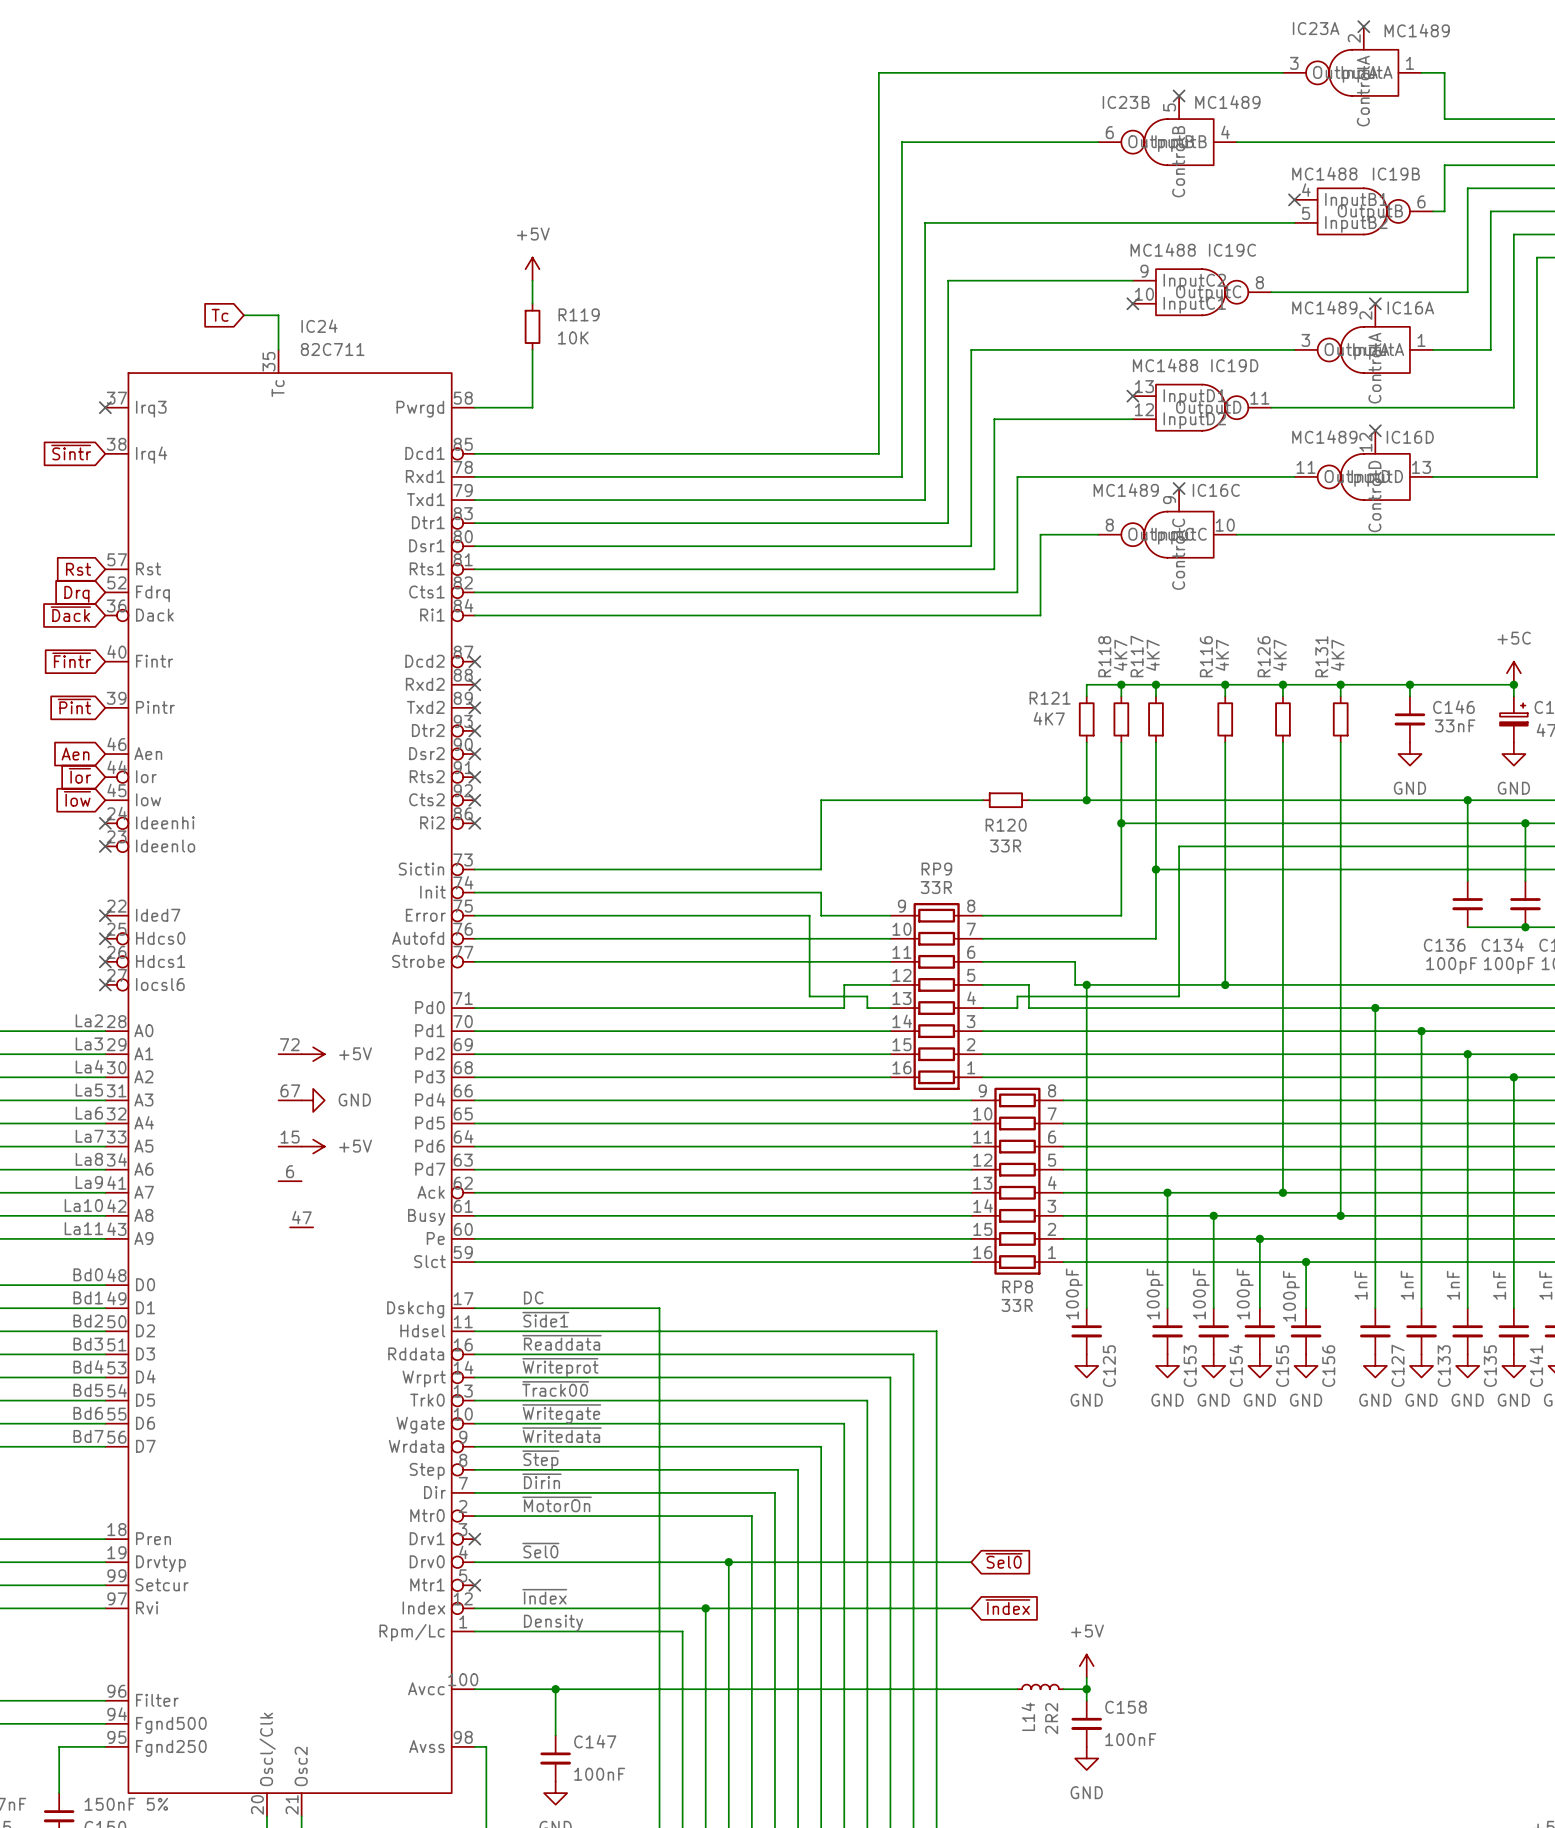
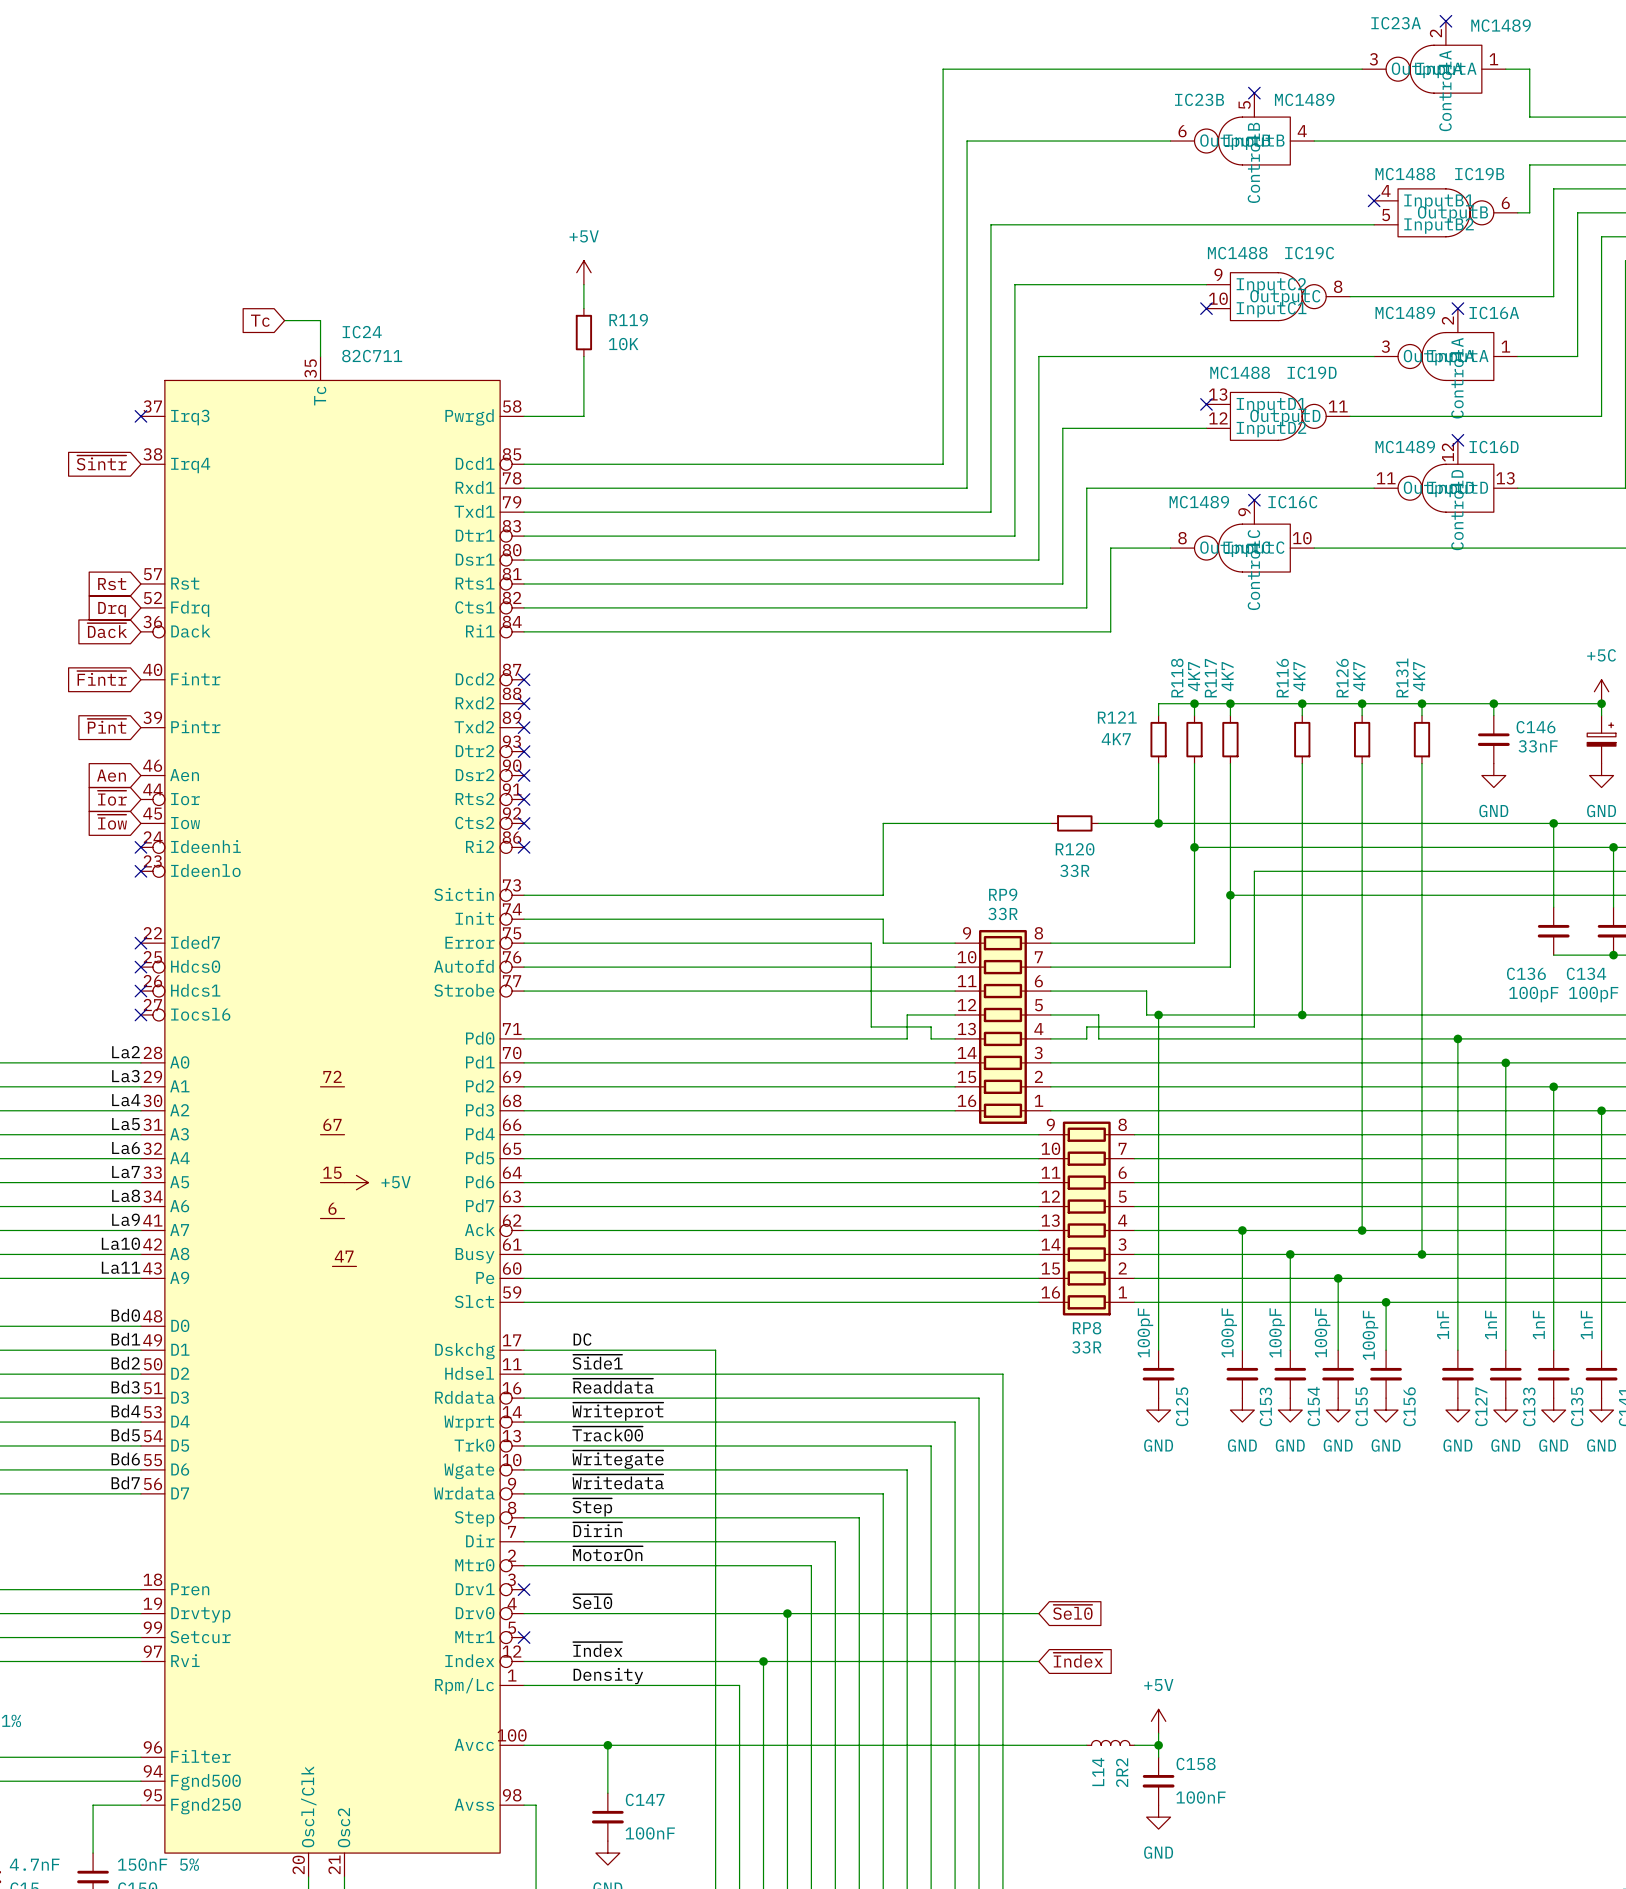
power symbol: +5V (313, 1054) -> none
power symbol: GND (313, 1100) -> none

